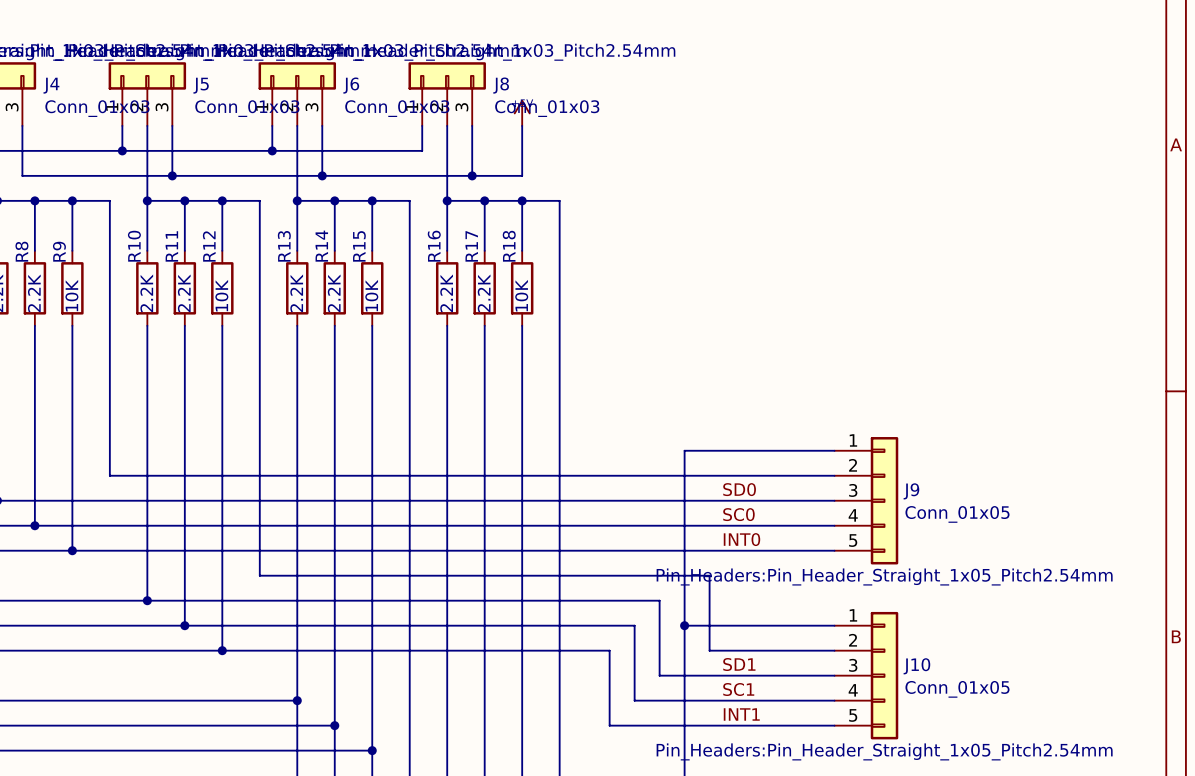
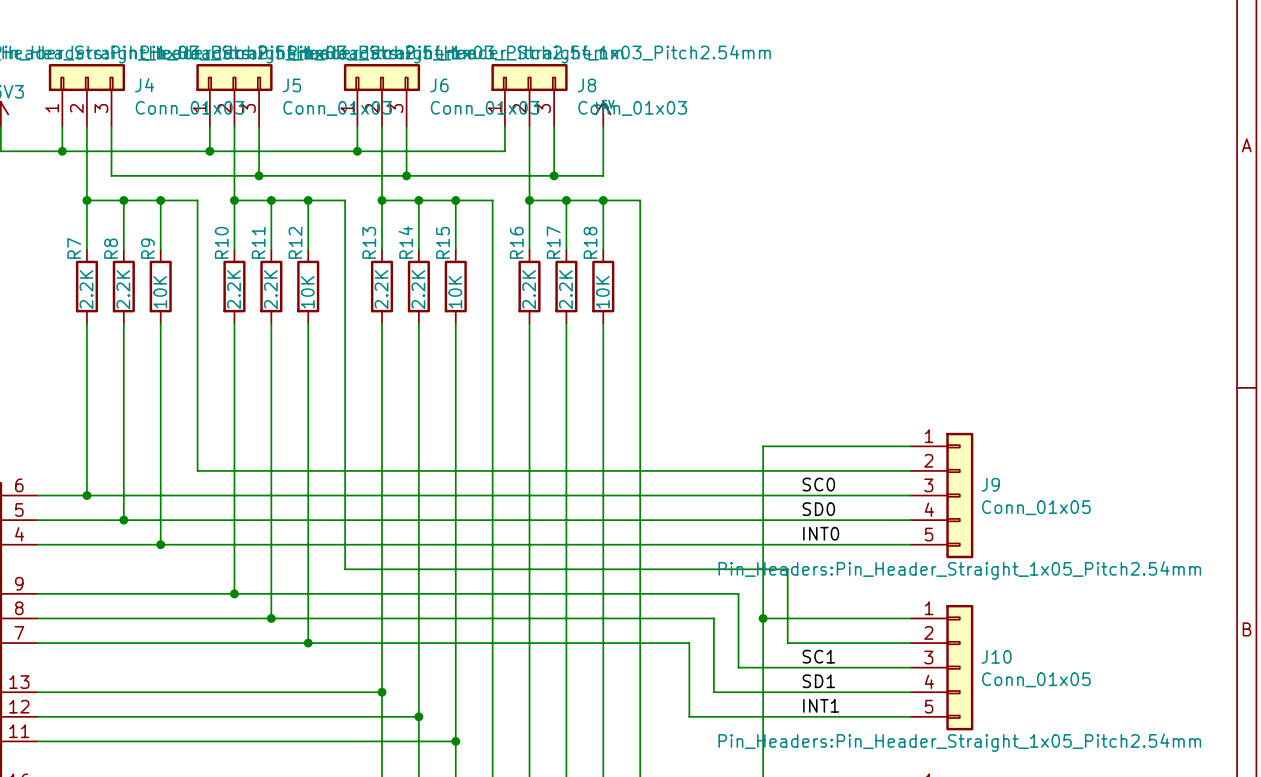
label: SD0 (739, 489) -> SC0 (818, 484)
label: SC0 (738, 514) -> SD0 (818, 509)
label: SD1 (739, 664) -> SC1 (818, 656)
label: SC1 (738, 689) -> SD1 (818, 681)

